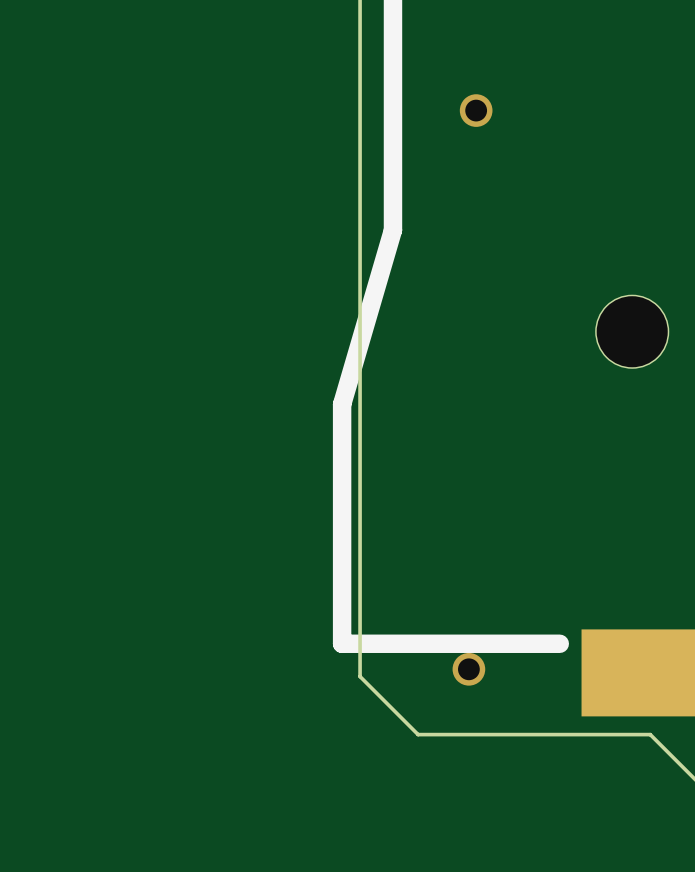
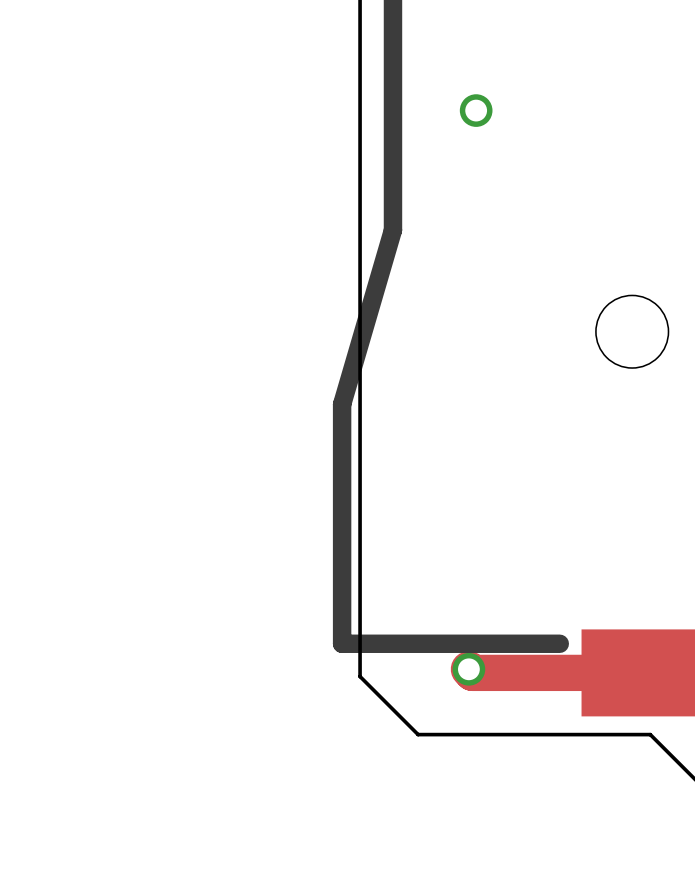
track: none -> (468, 669) (472, 672) (661, 672)

